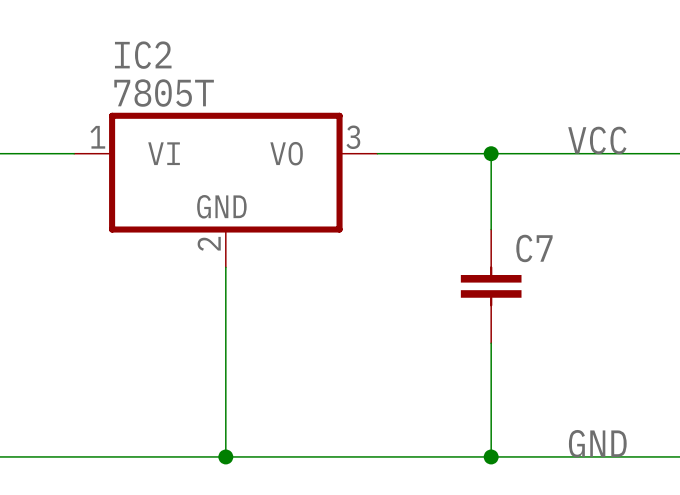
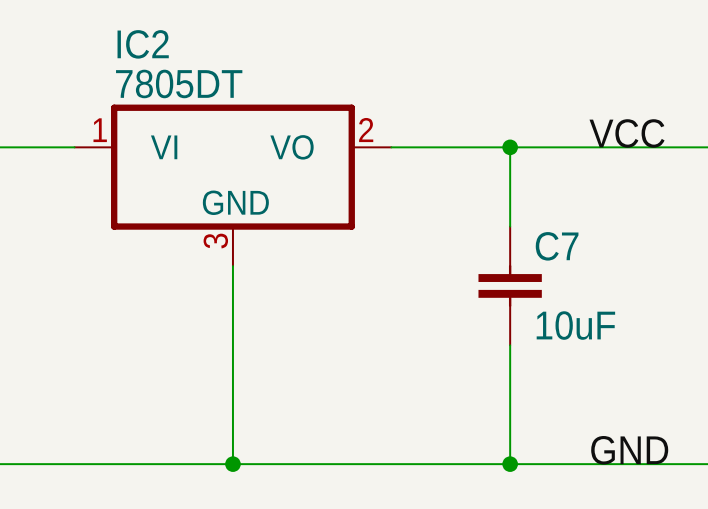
IC2 value: 7805T (164, 93) -> 7805DT (179, 83)
IC2 pin number: 3 (353, 137) -> 2 (366, 130)
IC2 pin number: 2 (209, 243) -> 3 (215, 241)
C7 value: none -> 10uF (575, 325)

